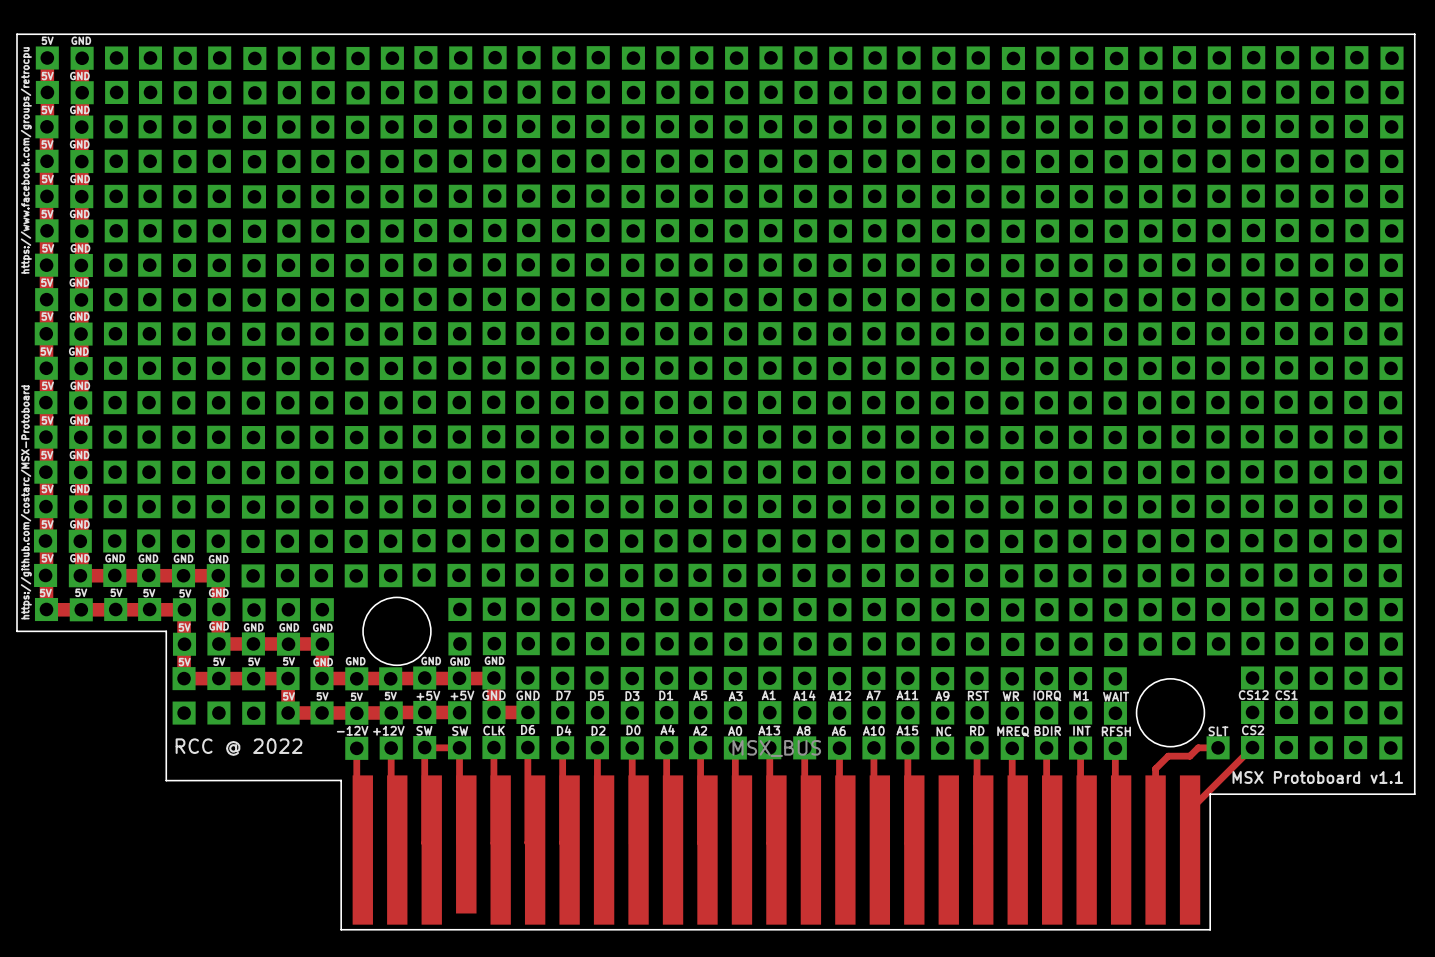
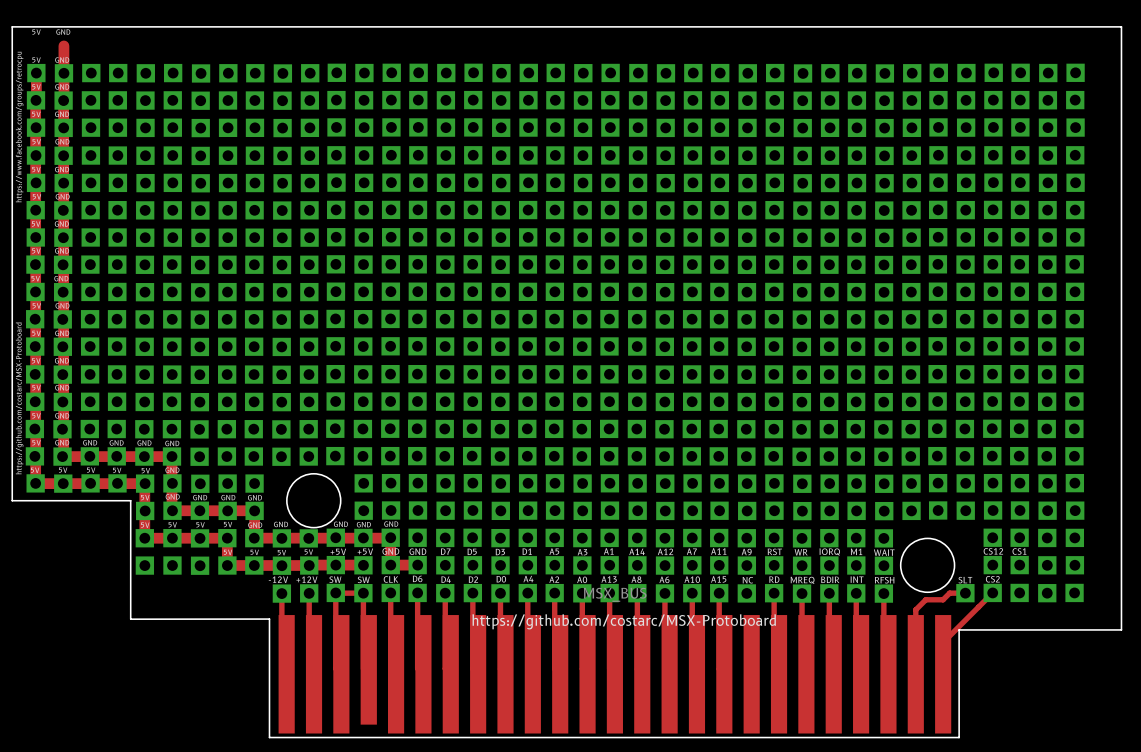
part: (47, 57) -> none
part: (116, 57) -> none
part: (150, 57) -> none
part: (219, 57) -> none
part: (425, 57) -> none
part: (460, 57) -> none
part: (495, 57) -> none
part: (529, 57) -> none
part: (563, 57) -> none
part: (598, 57) -> none
part: (667, 57) -> none
part: (701, 57) -> none
part: (770, 57) -> none
part: (805, 57) -> none
part: (875, 57) -> none
part: (909, 57) -> none
part: (978, 57) -> none
part: (1184, 57) -> none
part: (1219, 57) -> none
part: (1253, 57) -> none
part: (1287, 57) -> none
part: (1322, 57) -> none
part: (1356, 57) -> none
part: (82, 58) -> none
part: (185, 58) -> none
part: (254, 58) -> none
part: (289, 58) -> none
part: (323, 58) -> none
part: (357, 58) -> none
part: (392, 58) -> none
part: (633, 58) -> none
part: (736, 58) -> none
part: (840, 58) -> none
part: (943, 58) -> none
part: (1013, 58) -> none
part: (1047, 58) -> none
part: (1081, 58) -> none
part: (1116, 58) -> none
part: (1150, 58) -> none
part: (1392, 58) -> none
part: (1392, 92) -> none
part: (1391, 126) -> none
part: (1391, 161) -> none
part: (1391, 196) -> none
part: (1391, 230) -> none
part: (1391, 265) -> none
part: (1391, 299) -> none
part: (1390, 333) -> none
part: (1391, 368) -> none
part: (1390, 402) -> none
part: (1390, 437) -> none
part: (1390, 472) -> none
part: (1390, 506) -> none
part: (1390, 541) -> none
part: (1390, 575) -> none
part: (1391, 609) -> none
part: (1391, 644) -> none
part: (1390, 678) -> none
part: (1390, 712) -> none
text: RCC @ 2022 (239, 747) -> none
part: (1390, 748) -> none
text: MSX Protoboard v1.1 (1317, 777) -> none
text: none -> https://github.com/costarc/MSX-Protoboard (624, 621)

